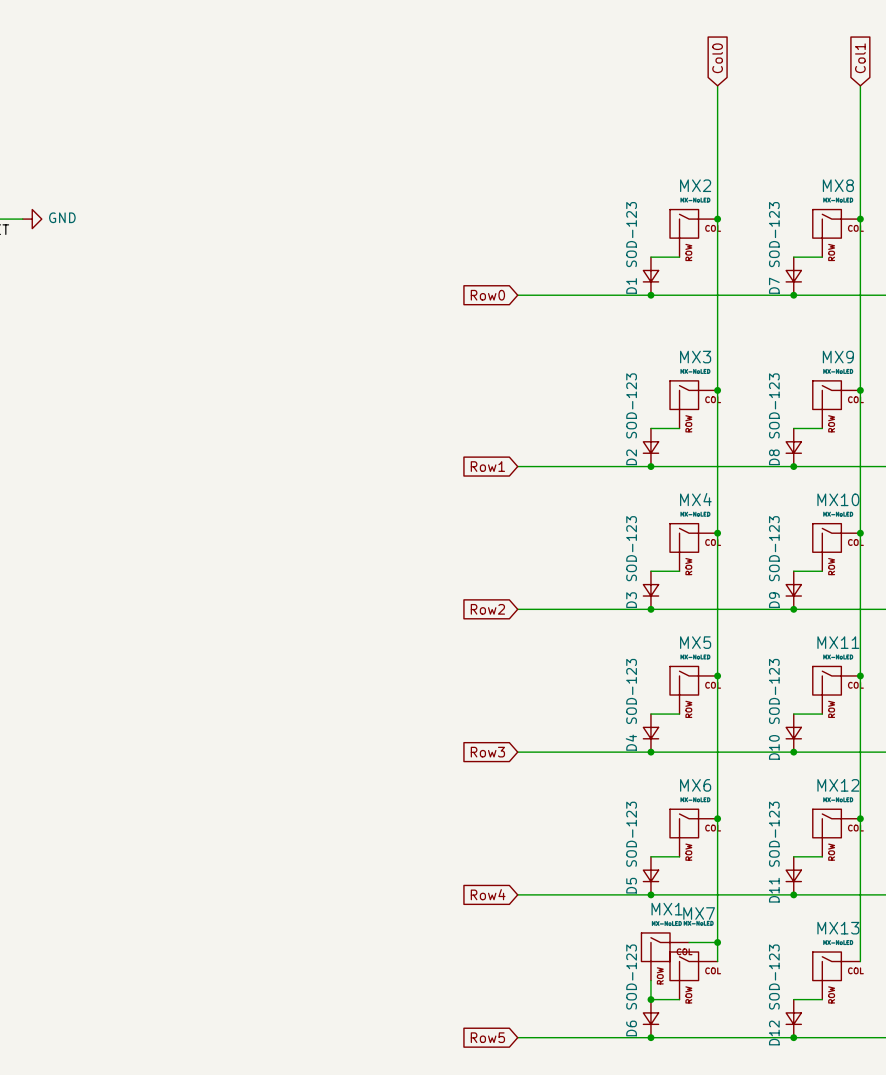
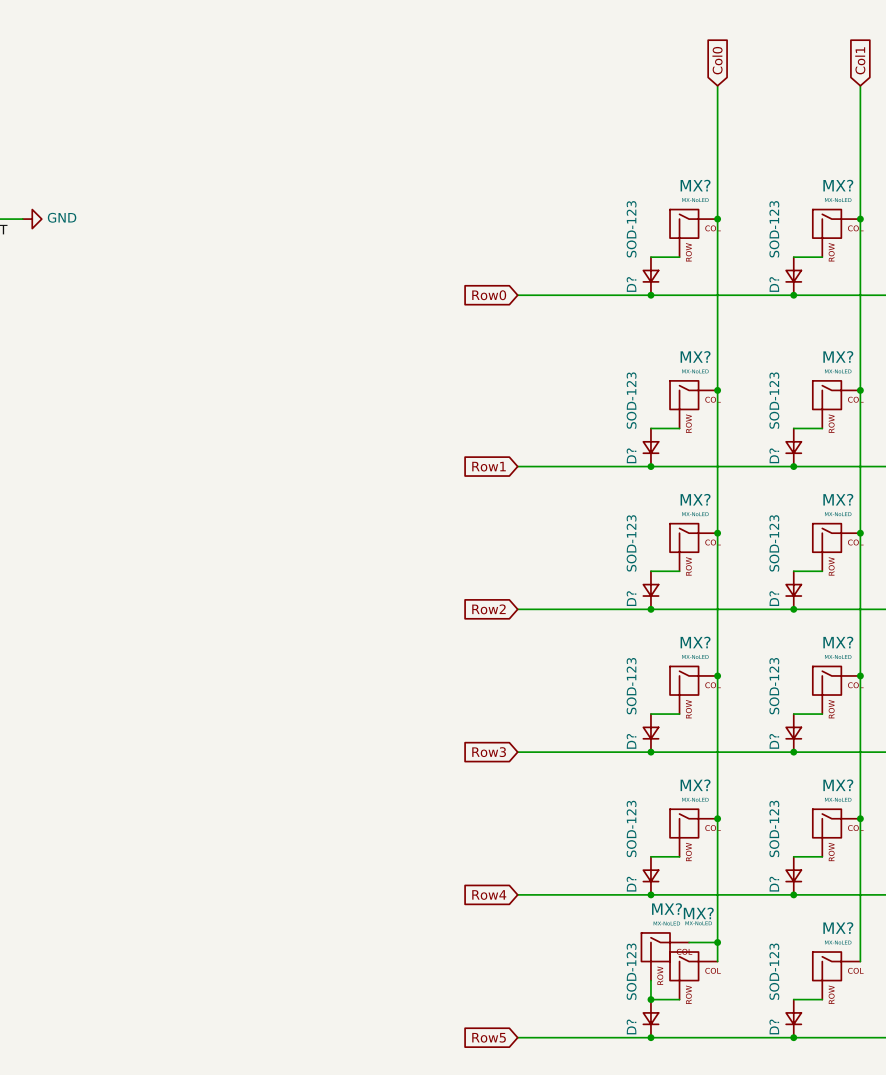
MX2 name: MX2 (695, 185) -> MX? (695, 185)
MX8 name: MX8 (838, 185) -> MX? (838, 185)
D7 name: D7 (774, 285) -> D? (774, 284)
D1 name: D1 (631, 286) -> D? (631, 284)
MX3 name: MX3 (695, 357) -> MX? (695, 356)
MX9 name: MX9 (838, 357) -> MX? (838, 356)
D2 name: D2 (631, 457) -> D? (631, 455)
D8 name: D8 (774, 457) -> D? (774, 455)
MX4 name: MX4 (695, 499) -> MX? (695, 499)
MX10 name: MX10 (838, 499) -> MX? (838, 499)
D3 name: D3 (631, 600) -> D? (631, 598)
D9 name: D9 (774, 600) -> D? (774, 598)
MX5 name: MX5 (695, 642) -> MX? (695, 642)
MX11 name: MX11 (838, 642) -> MX? (838, 642)
D4 name: D4 (631, 742) -> D? (631, 741)
D10 name: D10 (774, 747) -> D? (774, 741)
MX6 name: MX6 (695, 785) -> MX? (695, 785)
MX12 name: MX12 (838, 785) -> MX? (838, 785)
D5 name: D5 (631, 885) -> D? (631, 884)
D11 name: D11 (774, 890) -> D? (774, 884)
MX1 name: MX1 (667, 909) -> MX? (667, 909)
MX7 name: MX7 (699, 913) -> MX? (698, 913)
MX13 name: MX13 (838, 928) -> MX? (838, 928)
D6 name: D6 (631, 1028) -> D? (631, 1026)
D12 name: D12 (774, 1032) -> D? (774, 1026)

